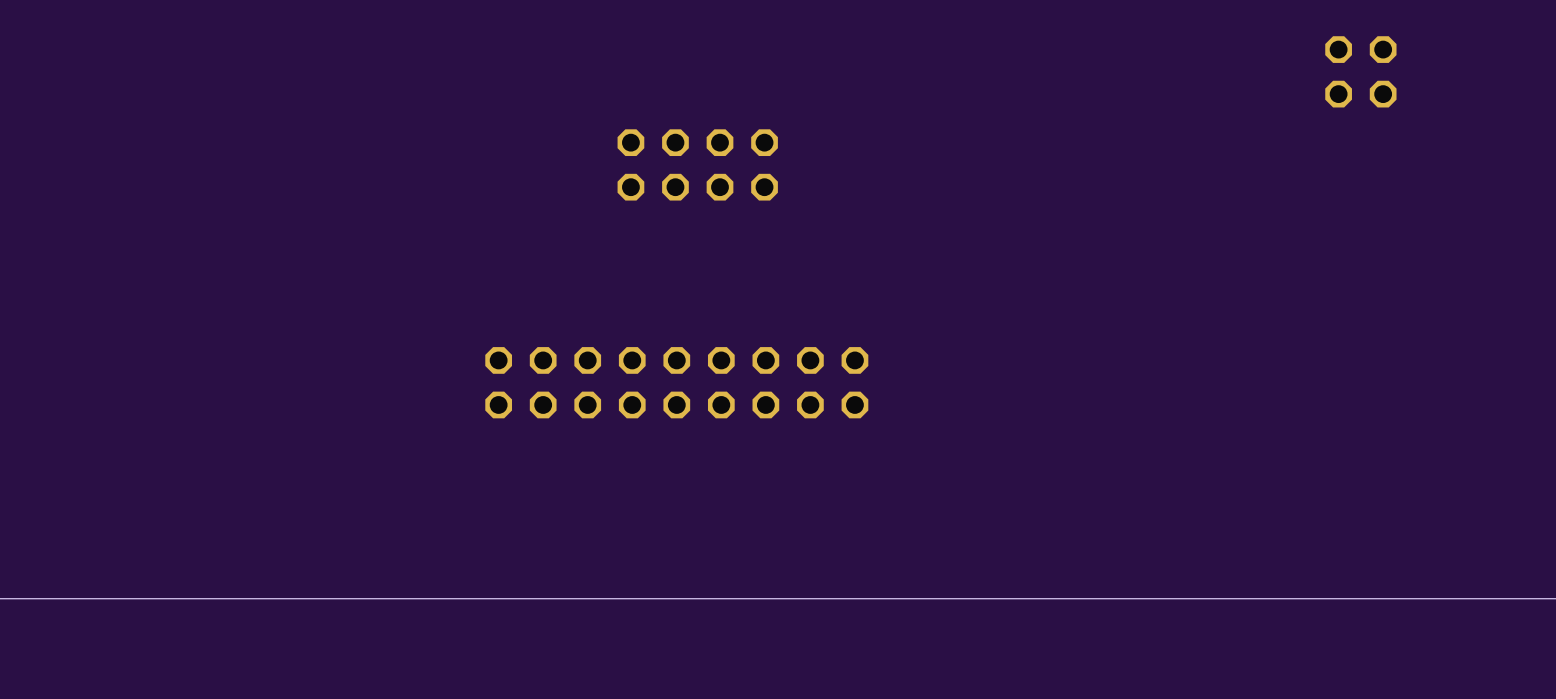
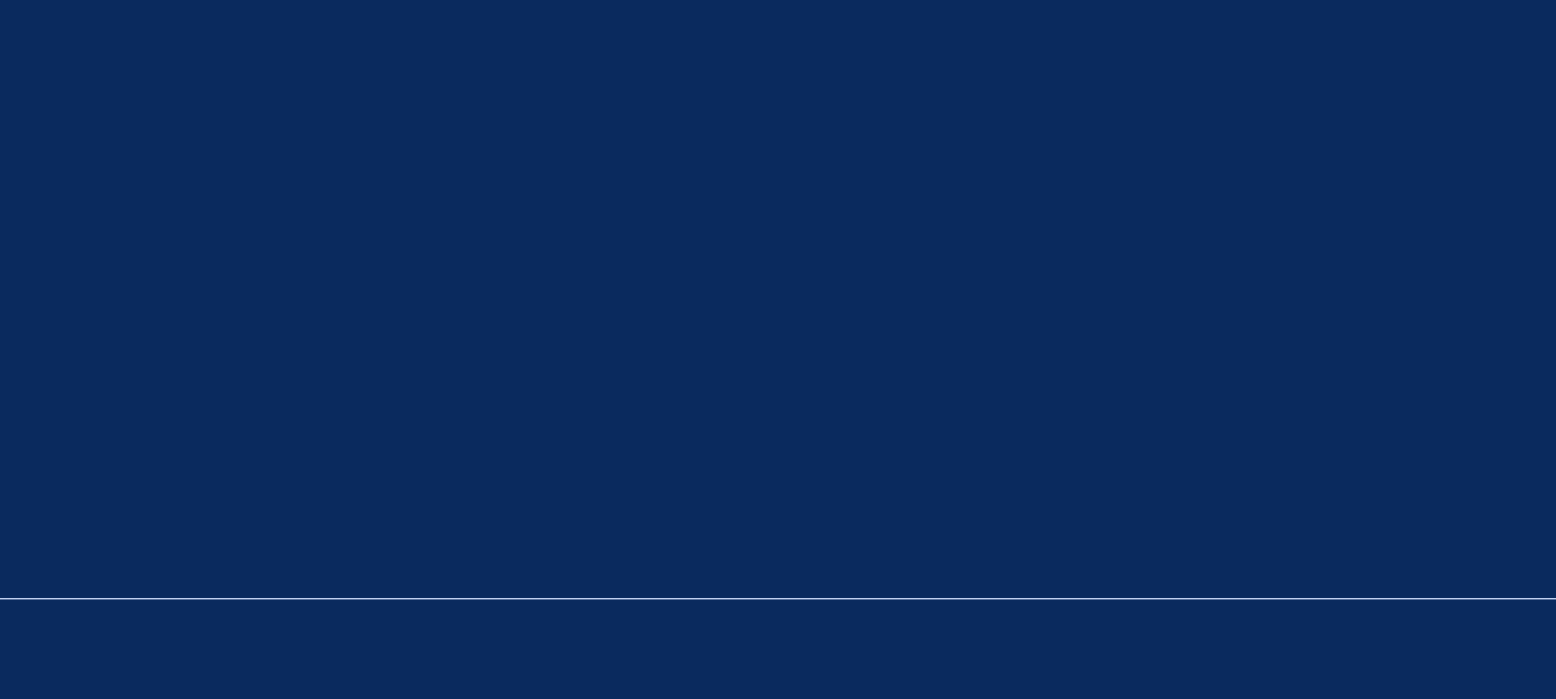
part: (1360, 71) -> none
part: (697, 164) -> none
part: (676, 382) -> none

